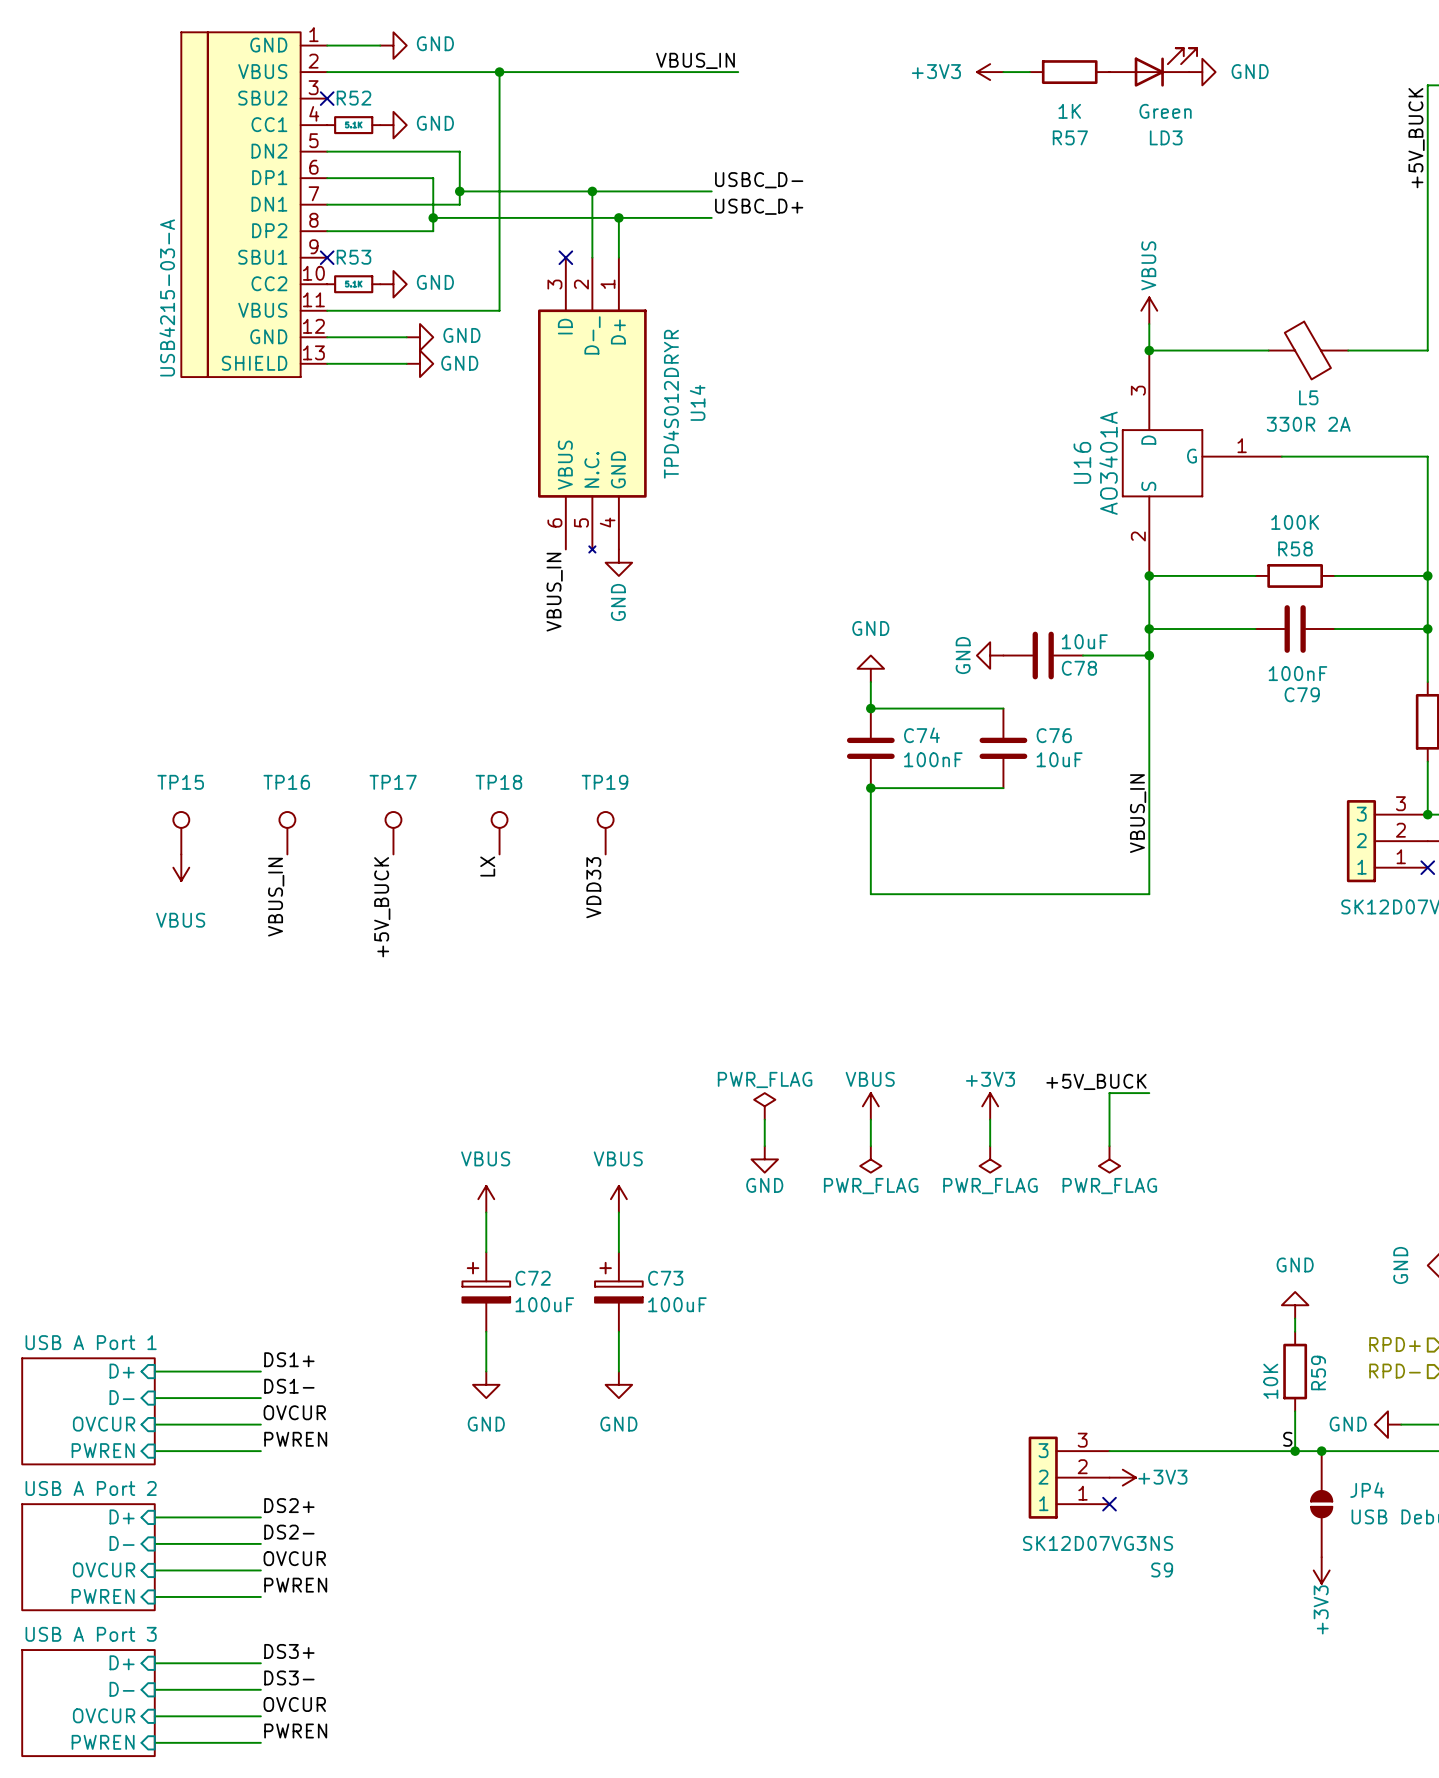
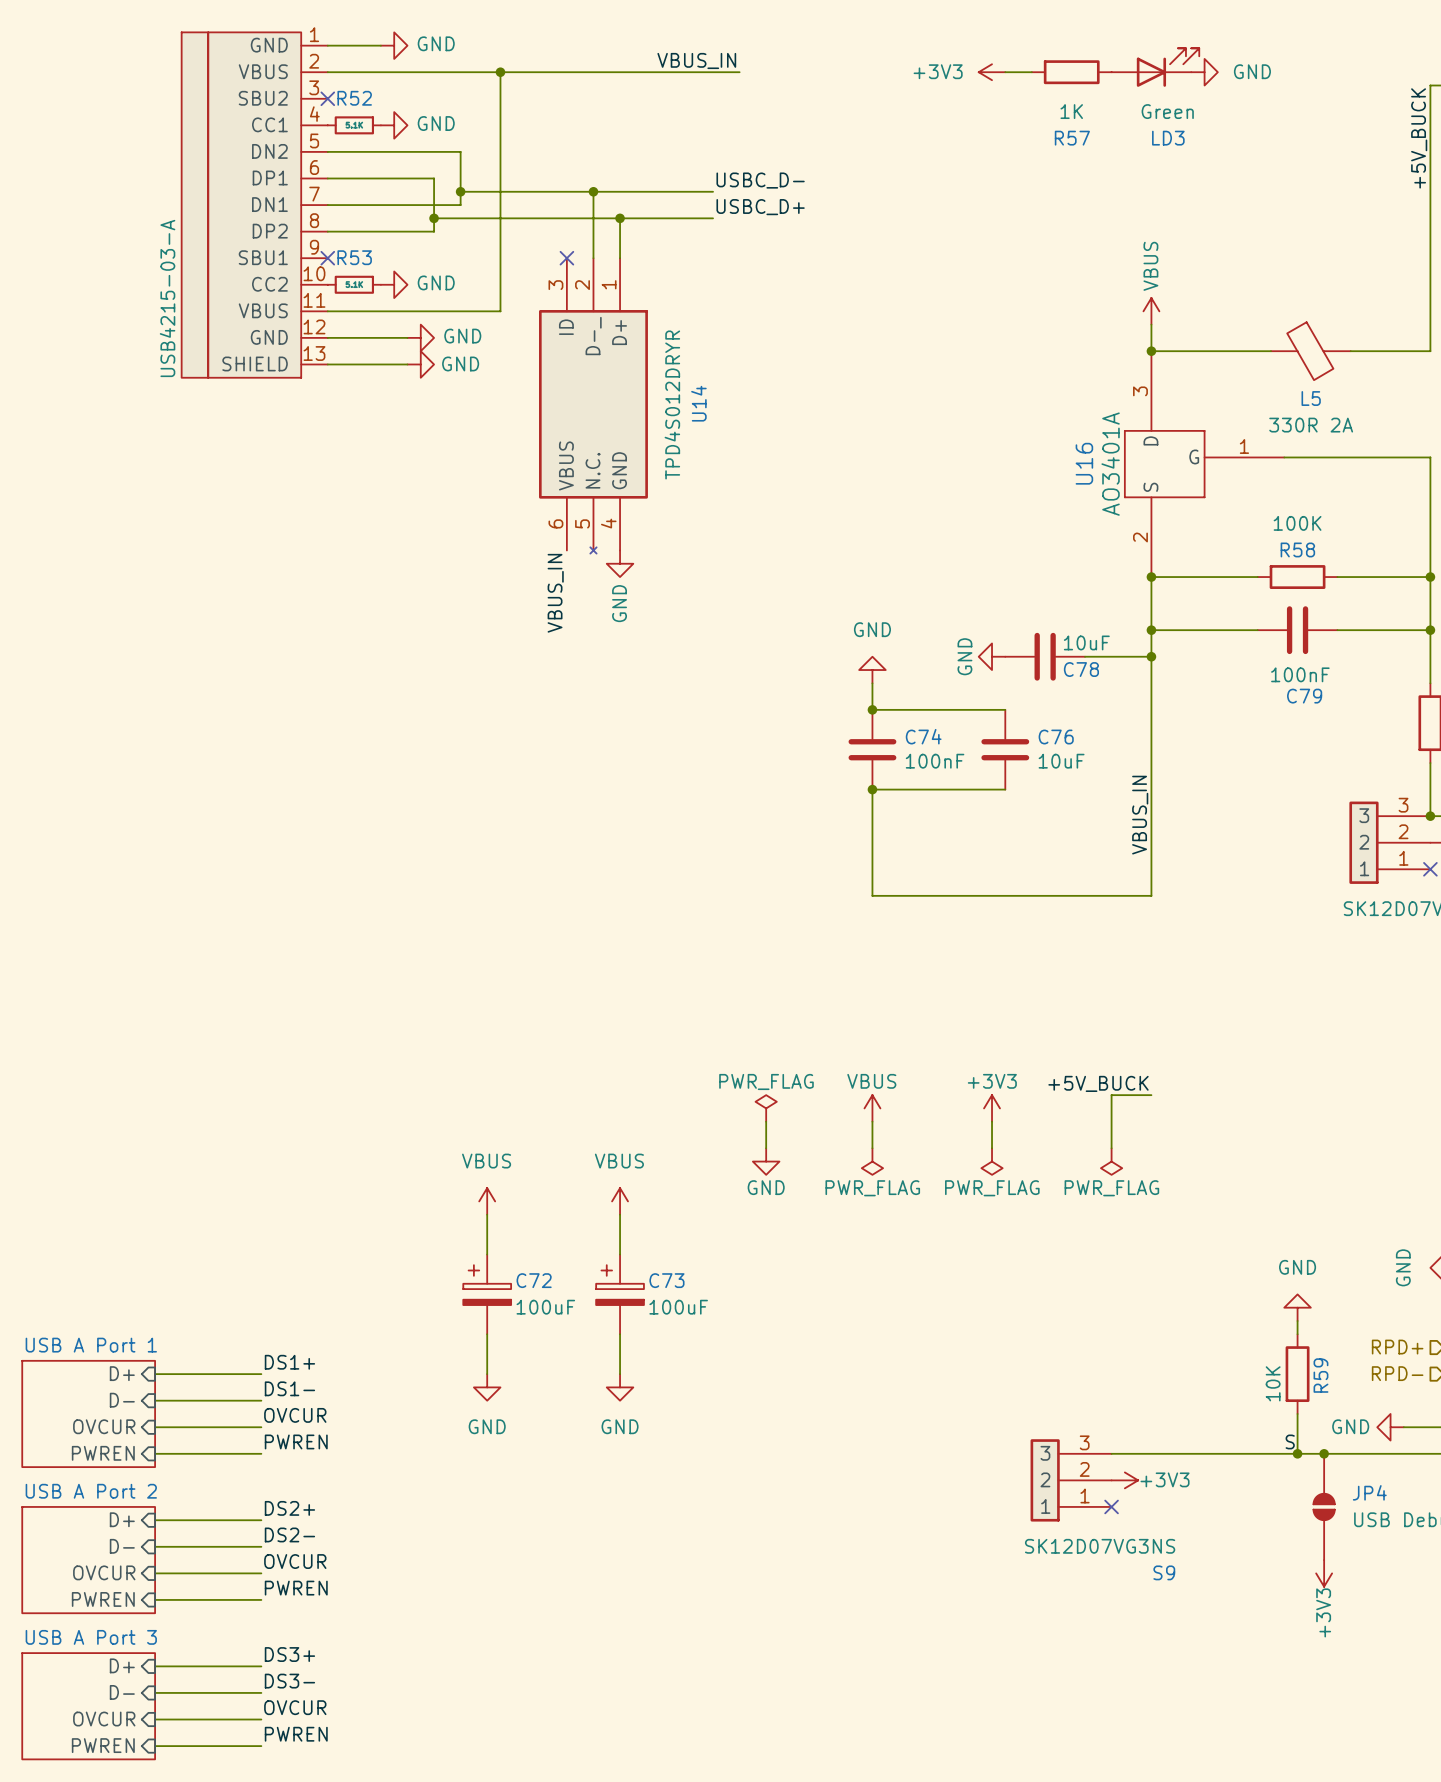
TP15: (181, 833) -> none
TP16: (287, 833) -> none
TP17: (393, 833) -> none
TP18: (499, 833) -> none
TP19: (605, 833) -> none
label: LX (487, 866) -> none
power symbol: VBUS (181, 867) -> none
label: VDD33 (593, 887) -> none
label: VBUS_IN (276, 897) -> none
label: +5V_BUCK (382, 907) -> none

